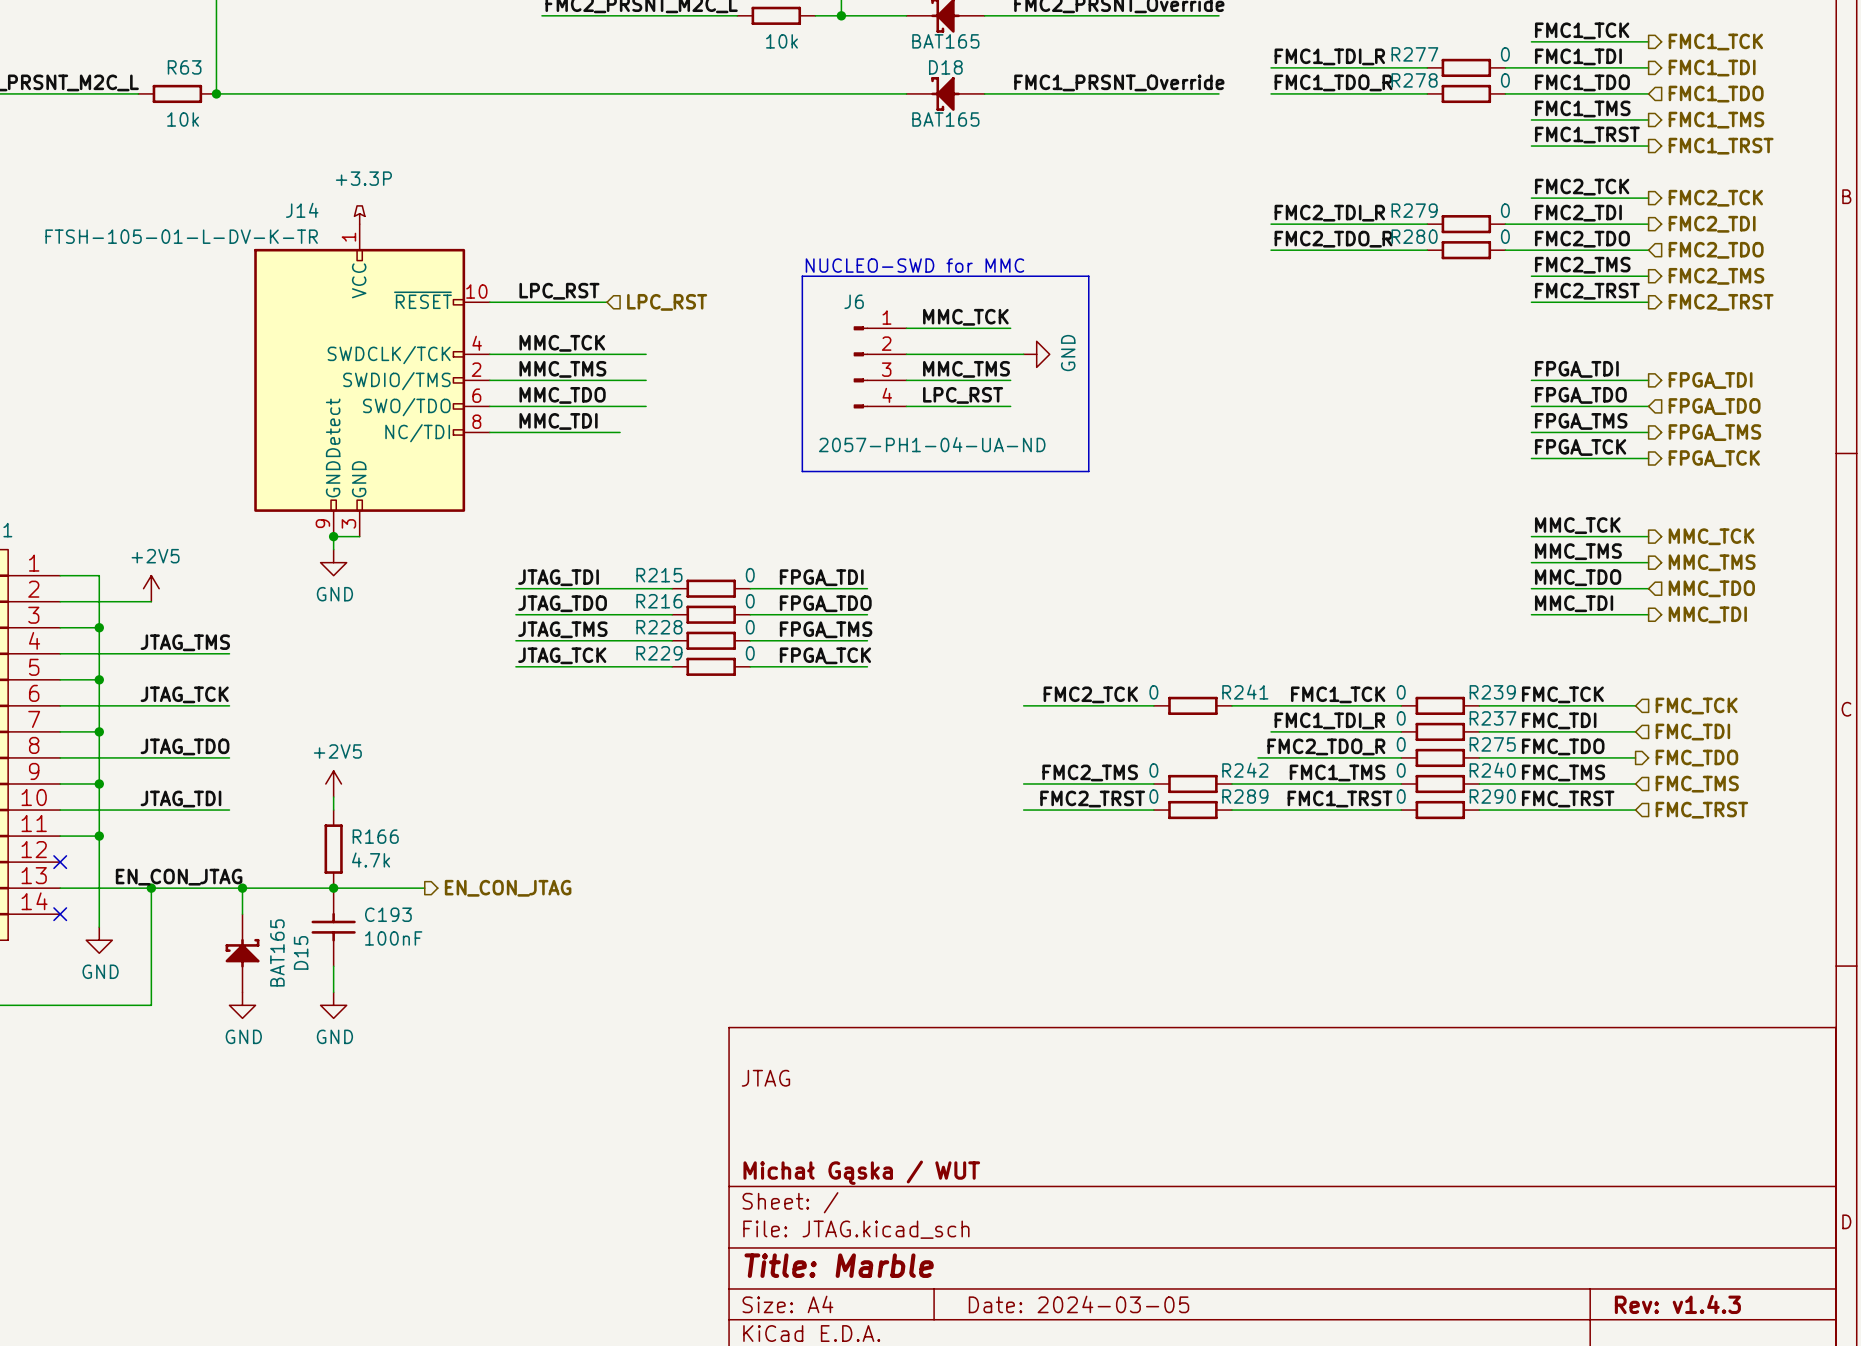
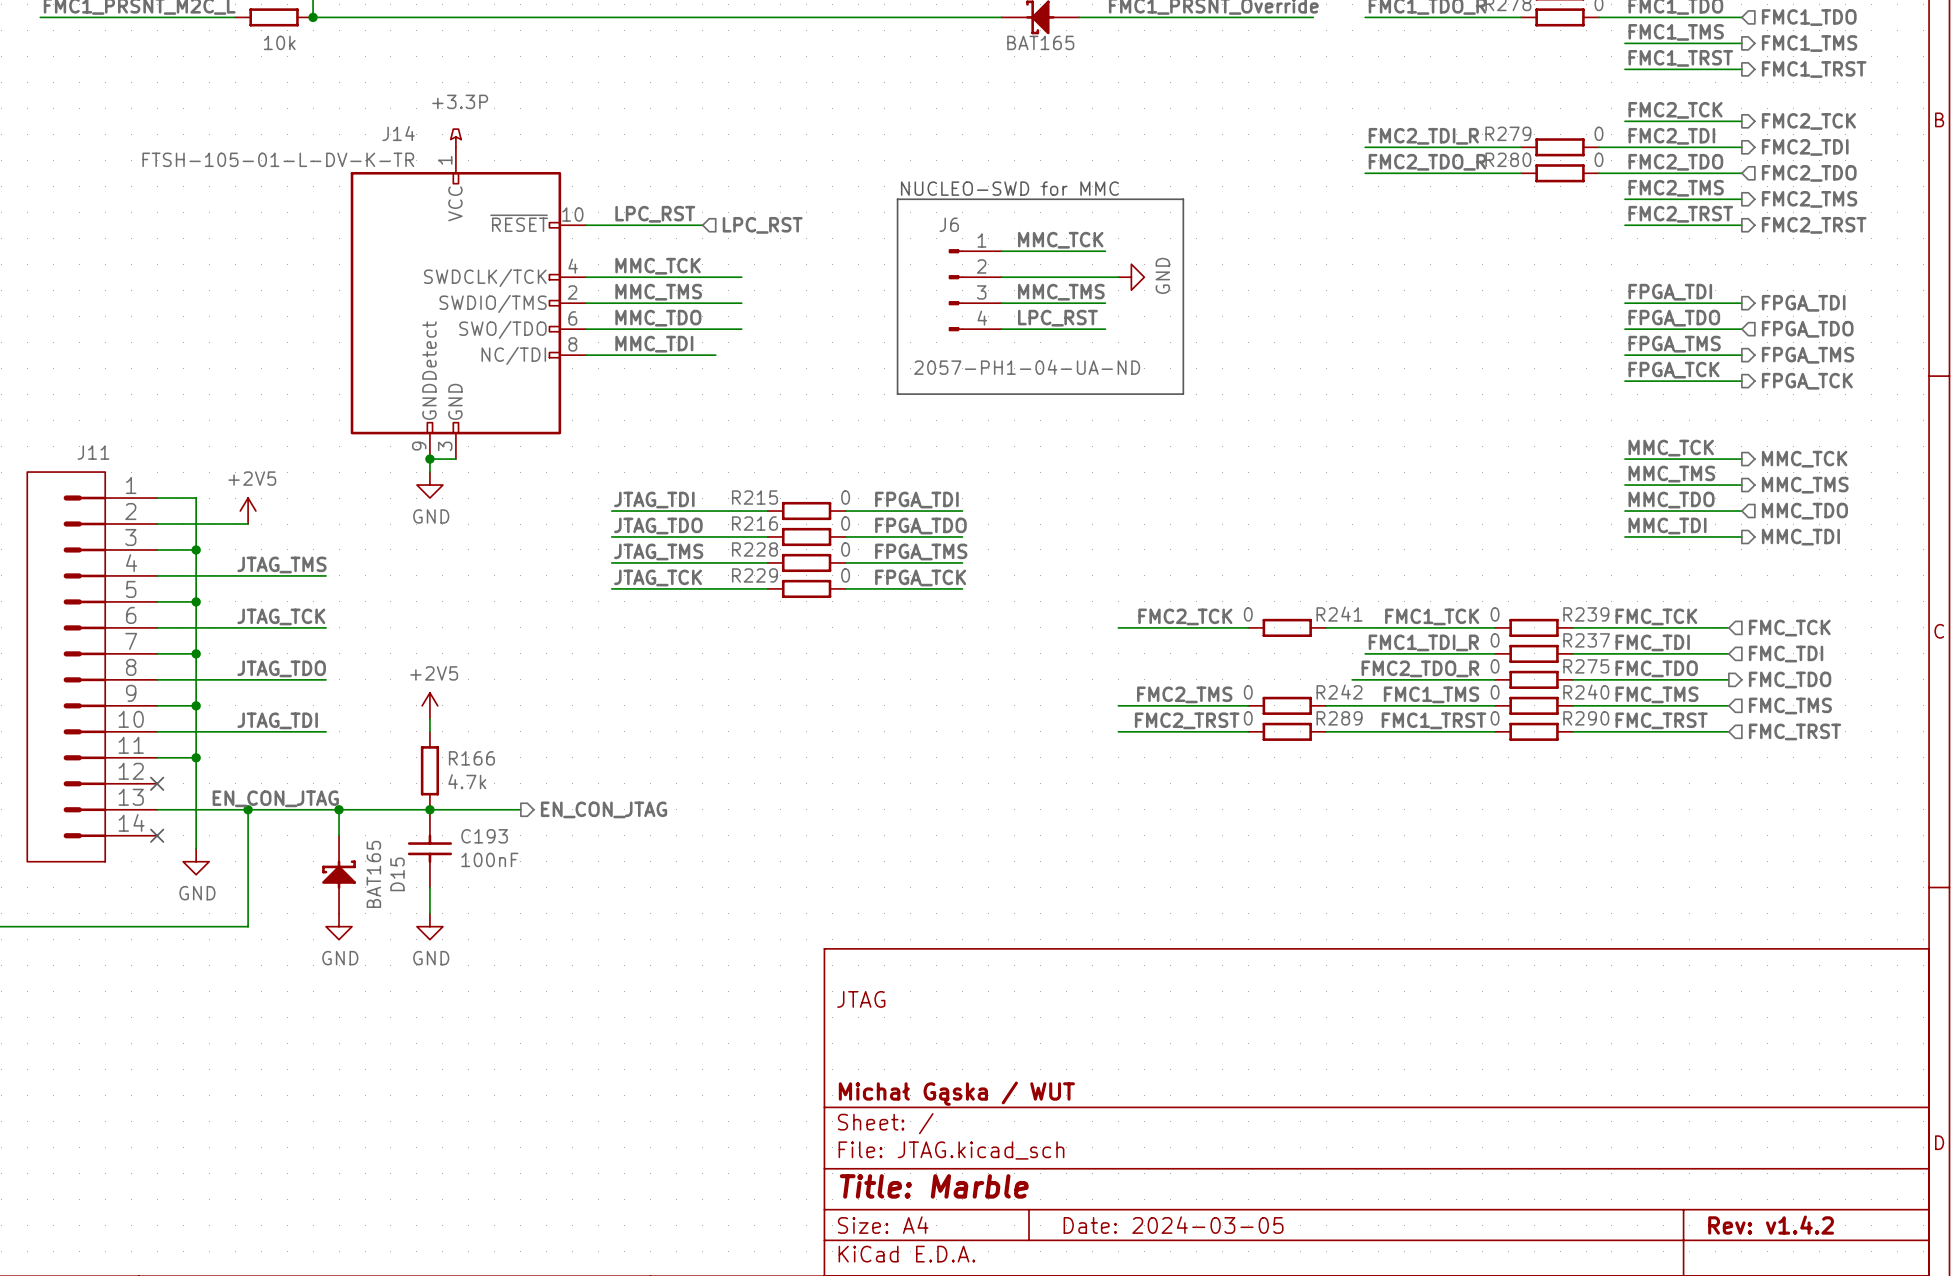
title block: Rev: v1.4.3 (1677, 1304) -> Rev: v1.4.2 (1771, 1225)

